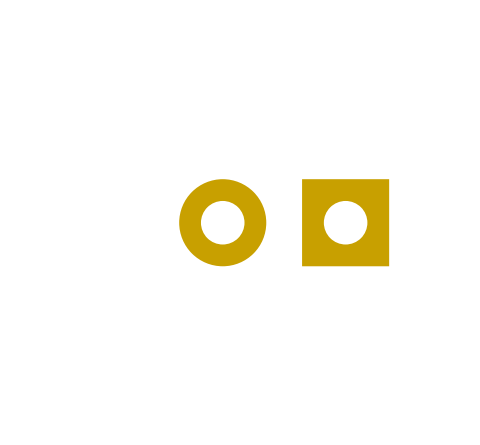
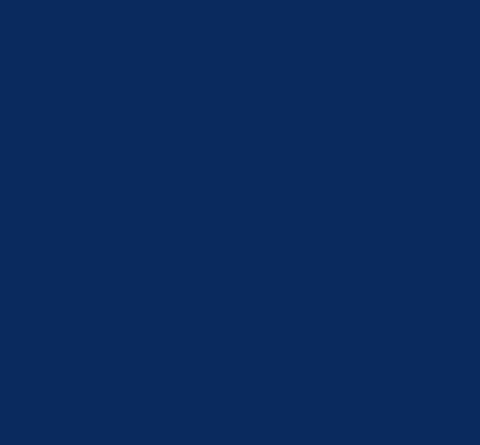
part: (284, 222) -> none

